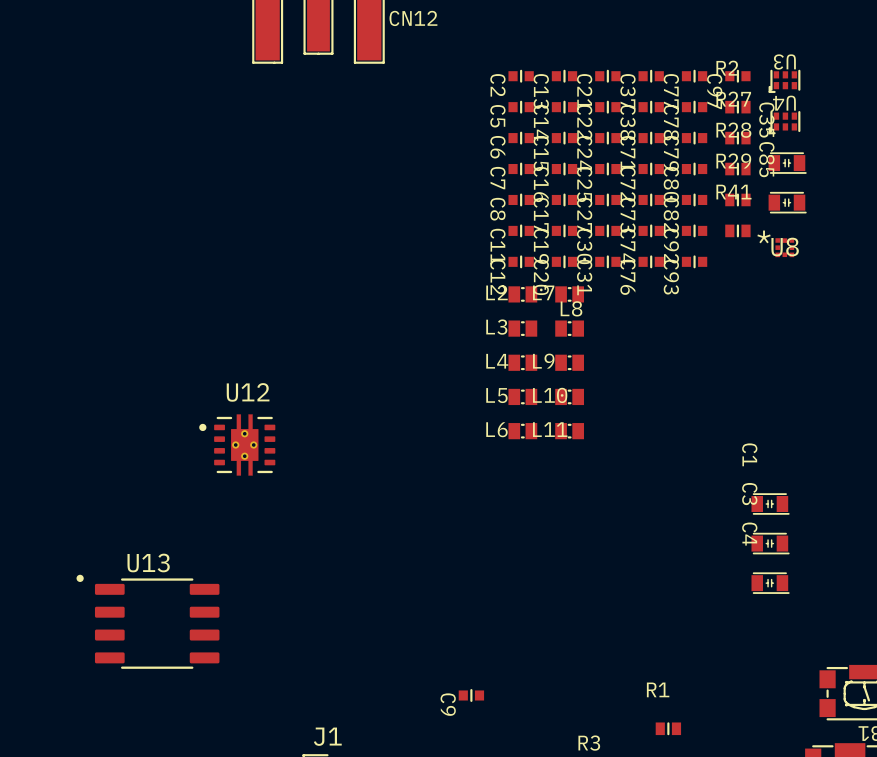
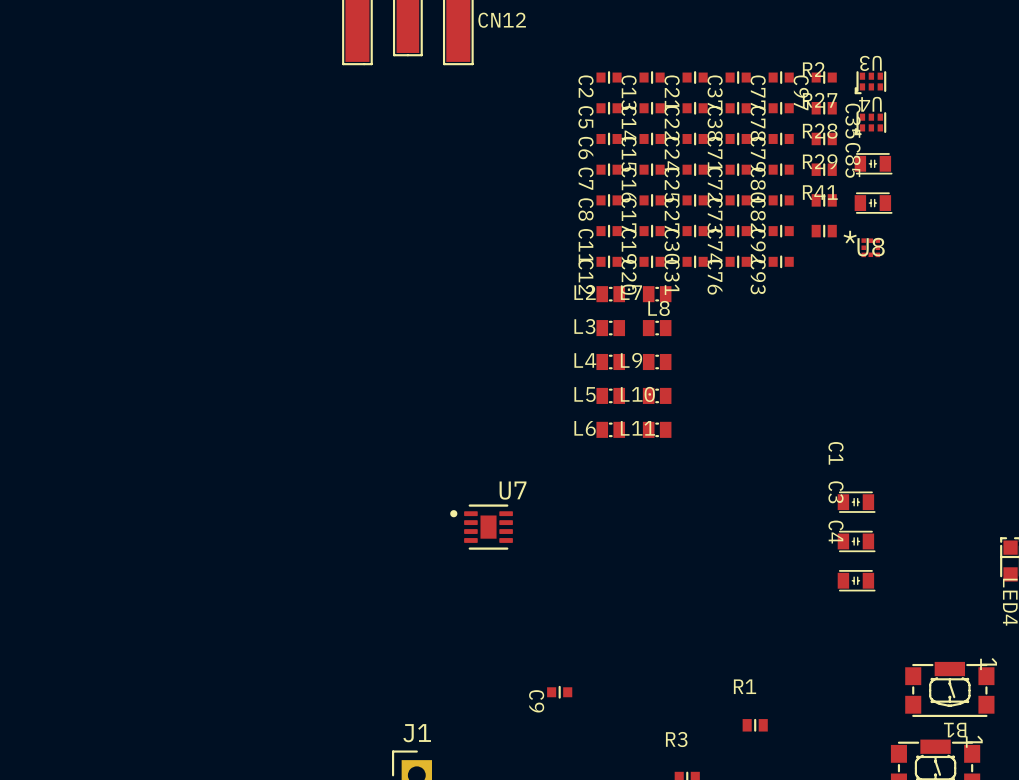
U12: (237, 444) -> none
U7: none -> (481, 527)
U13: (147, 621) -> none

